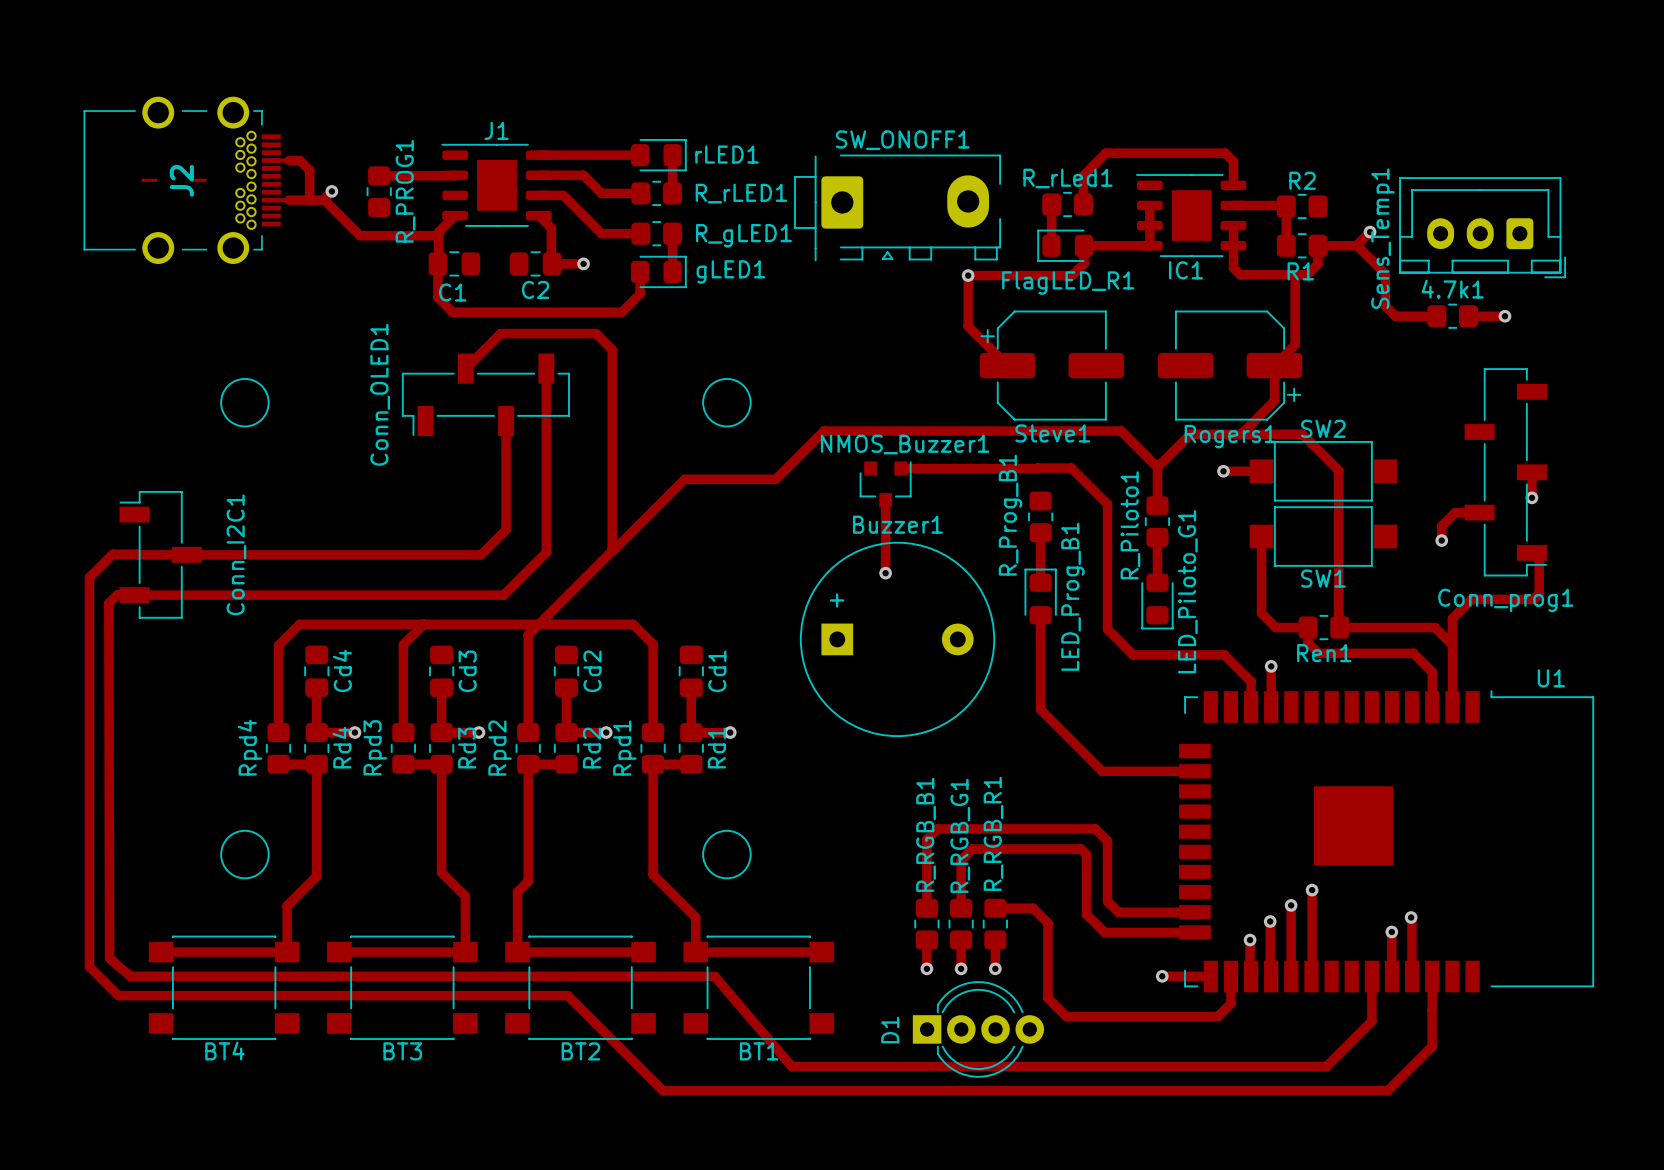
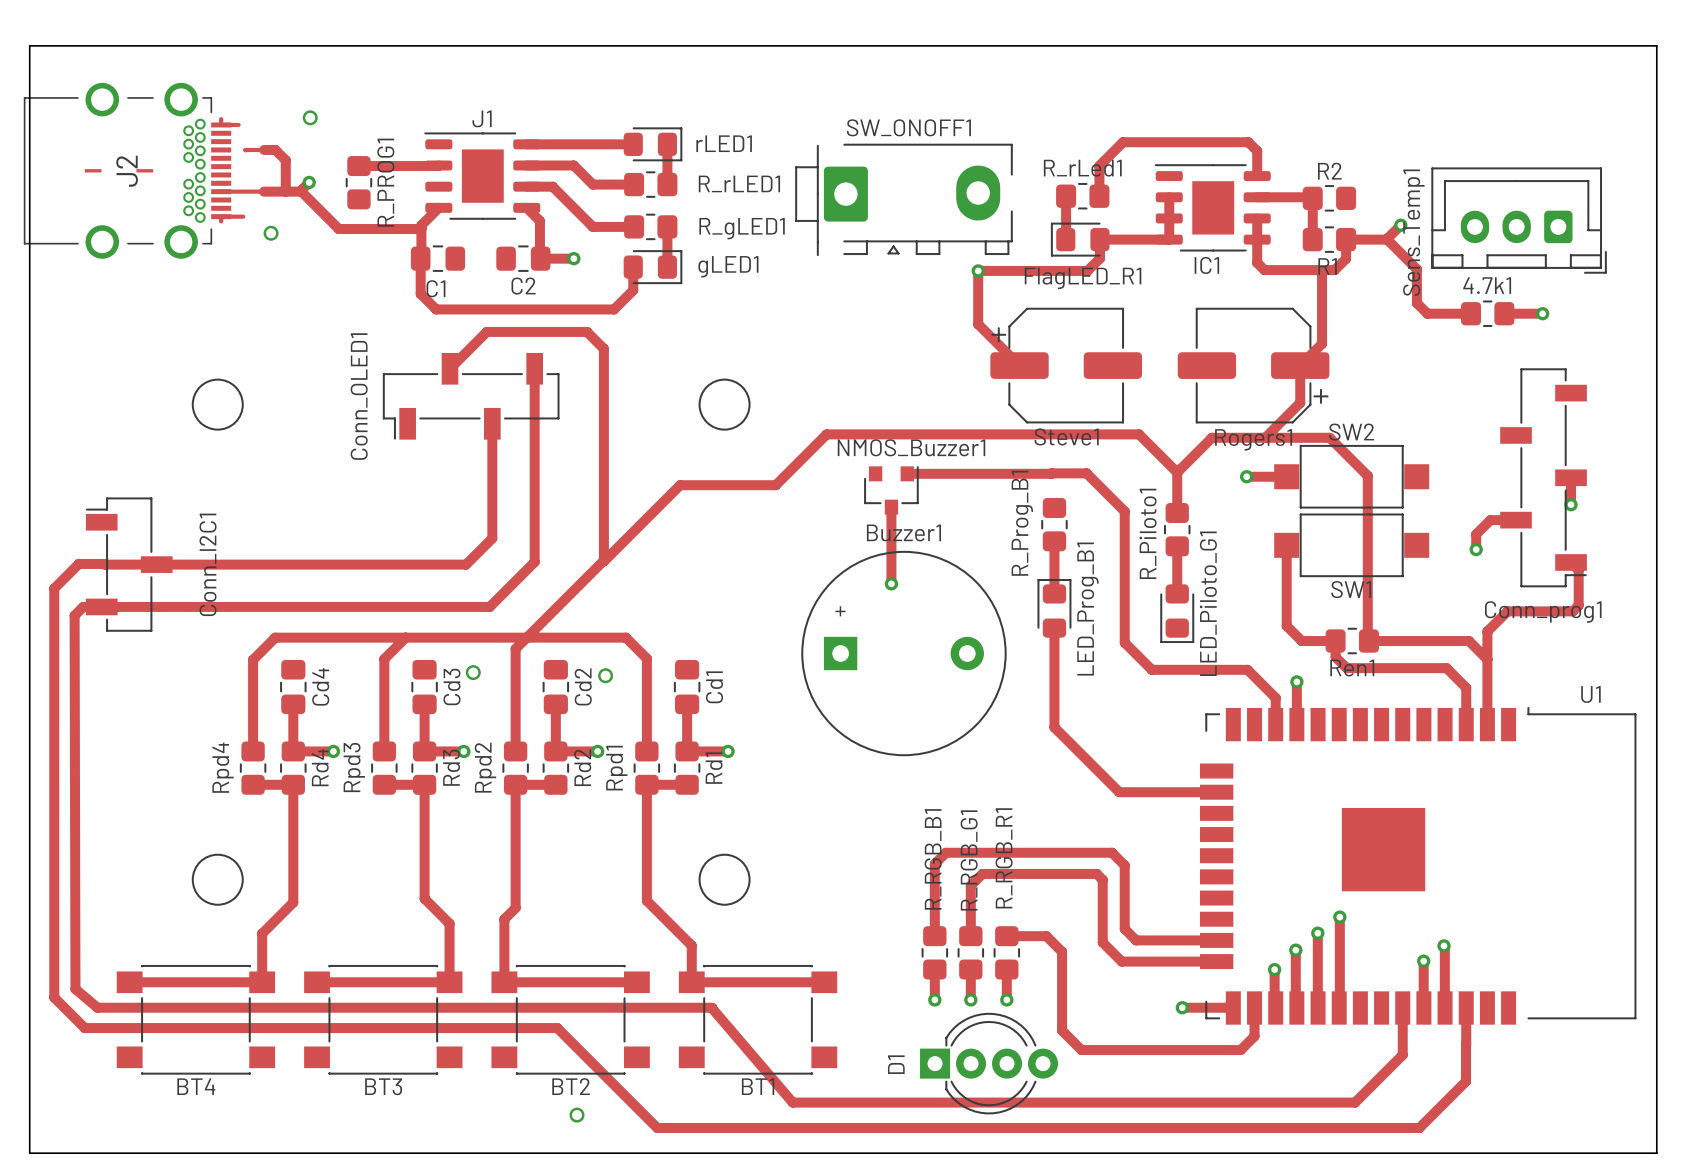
board edge: none -> (29, 45) (1656, 45) (1656, 1153) (29, 1153) (29, 45)
via: none -> (310, 117)
track: none -> (221, 119) (221, 124) (238, 124)
J2 position: (182, 180) -> (127, 170)
track: none -> (221, 191) (245, 191)
track: none -> (243, 216) (221, 216) (221, 221)
via: none -> (271, 233)
via: none -> (473, 672)
via: none -> (605, 675)
via: none -> (577, 1115)

